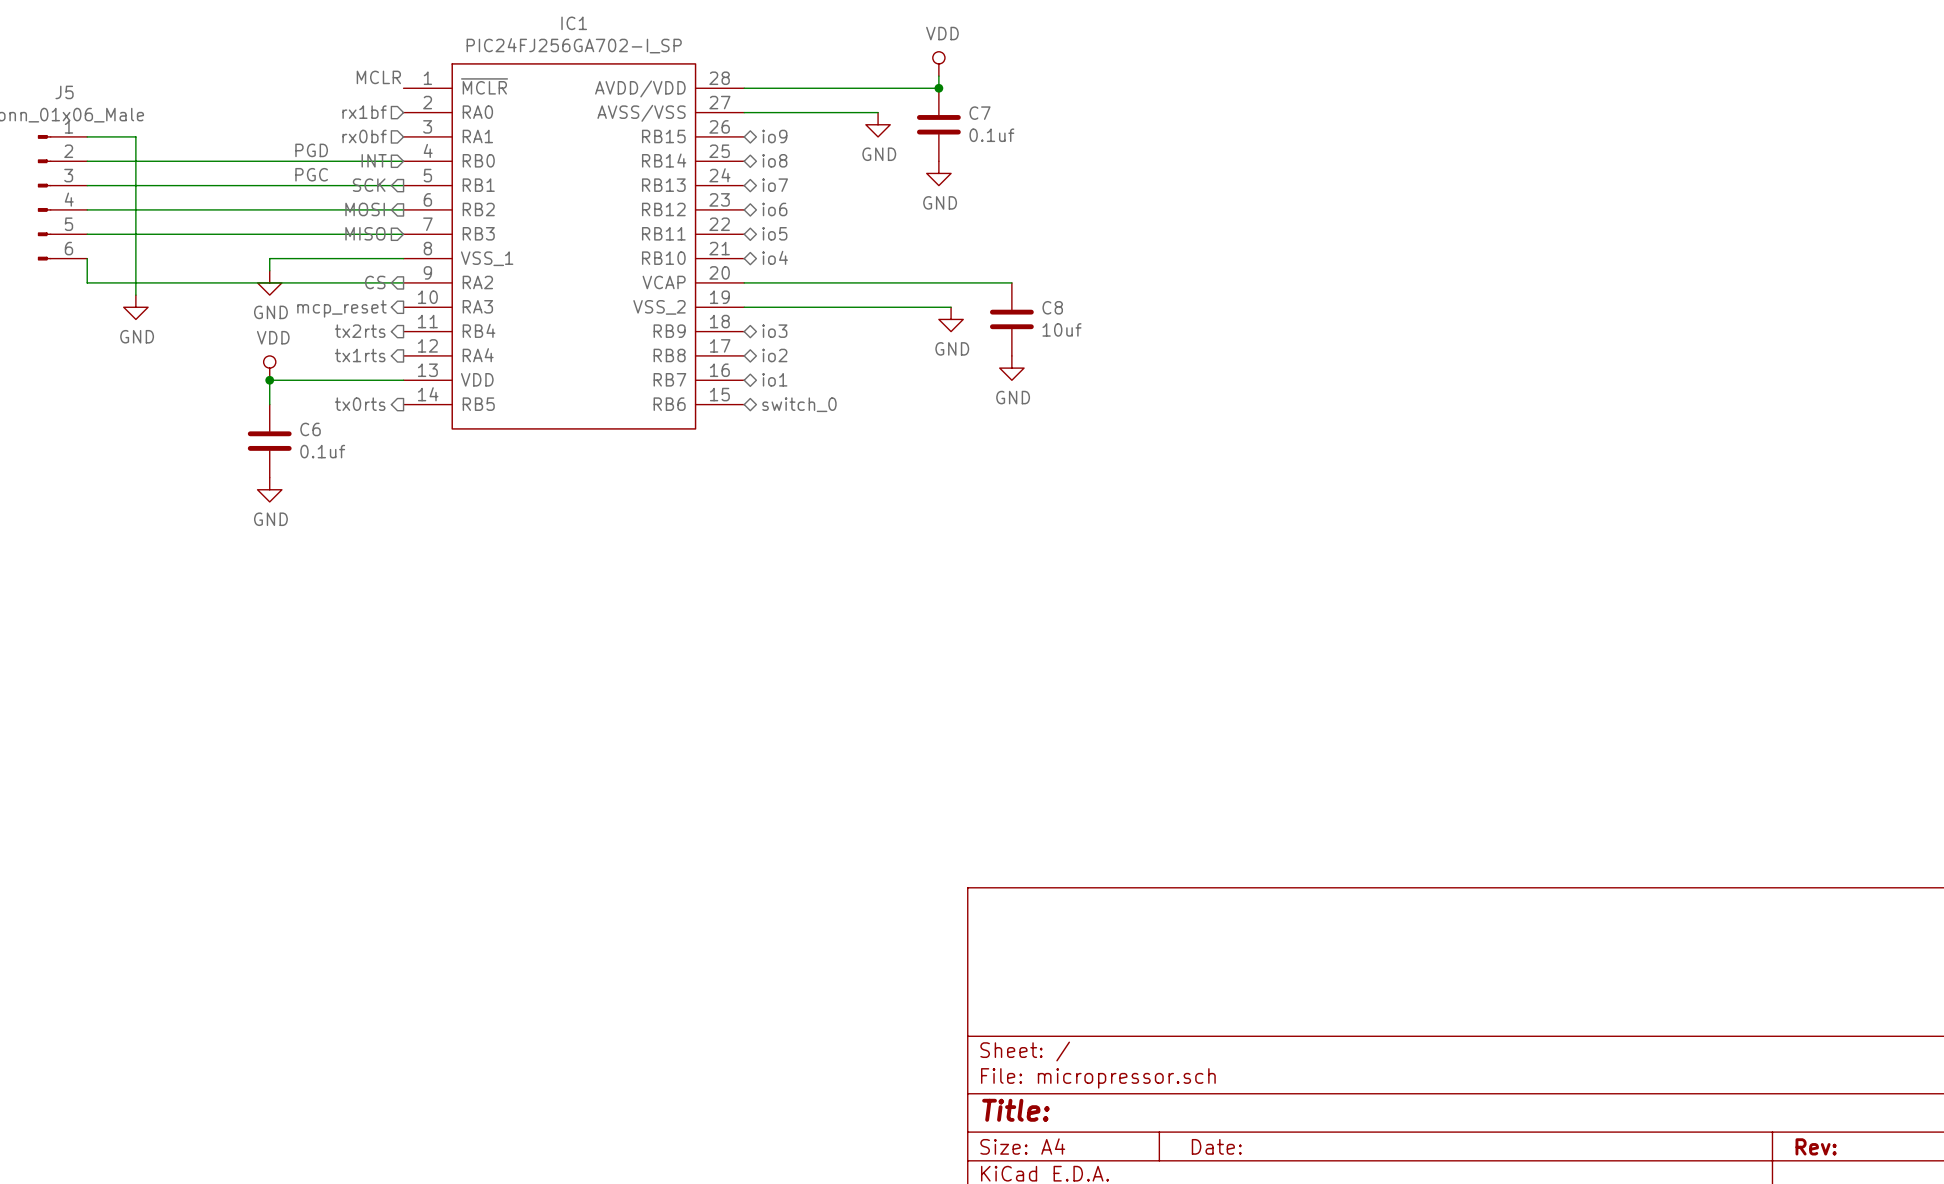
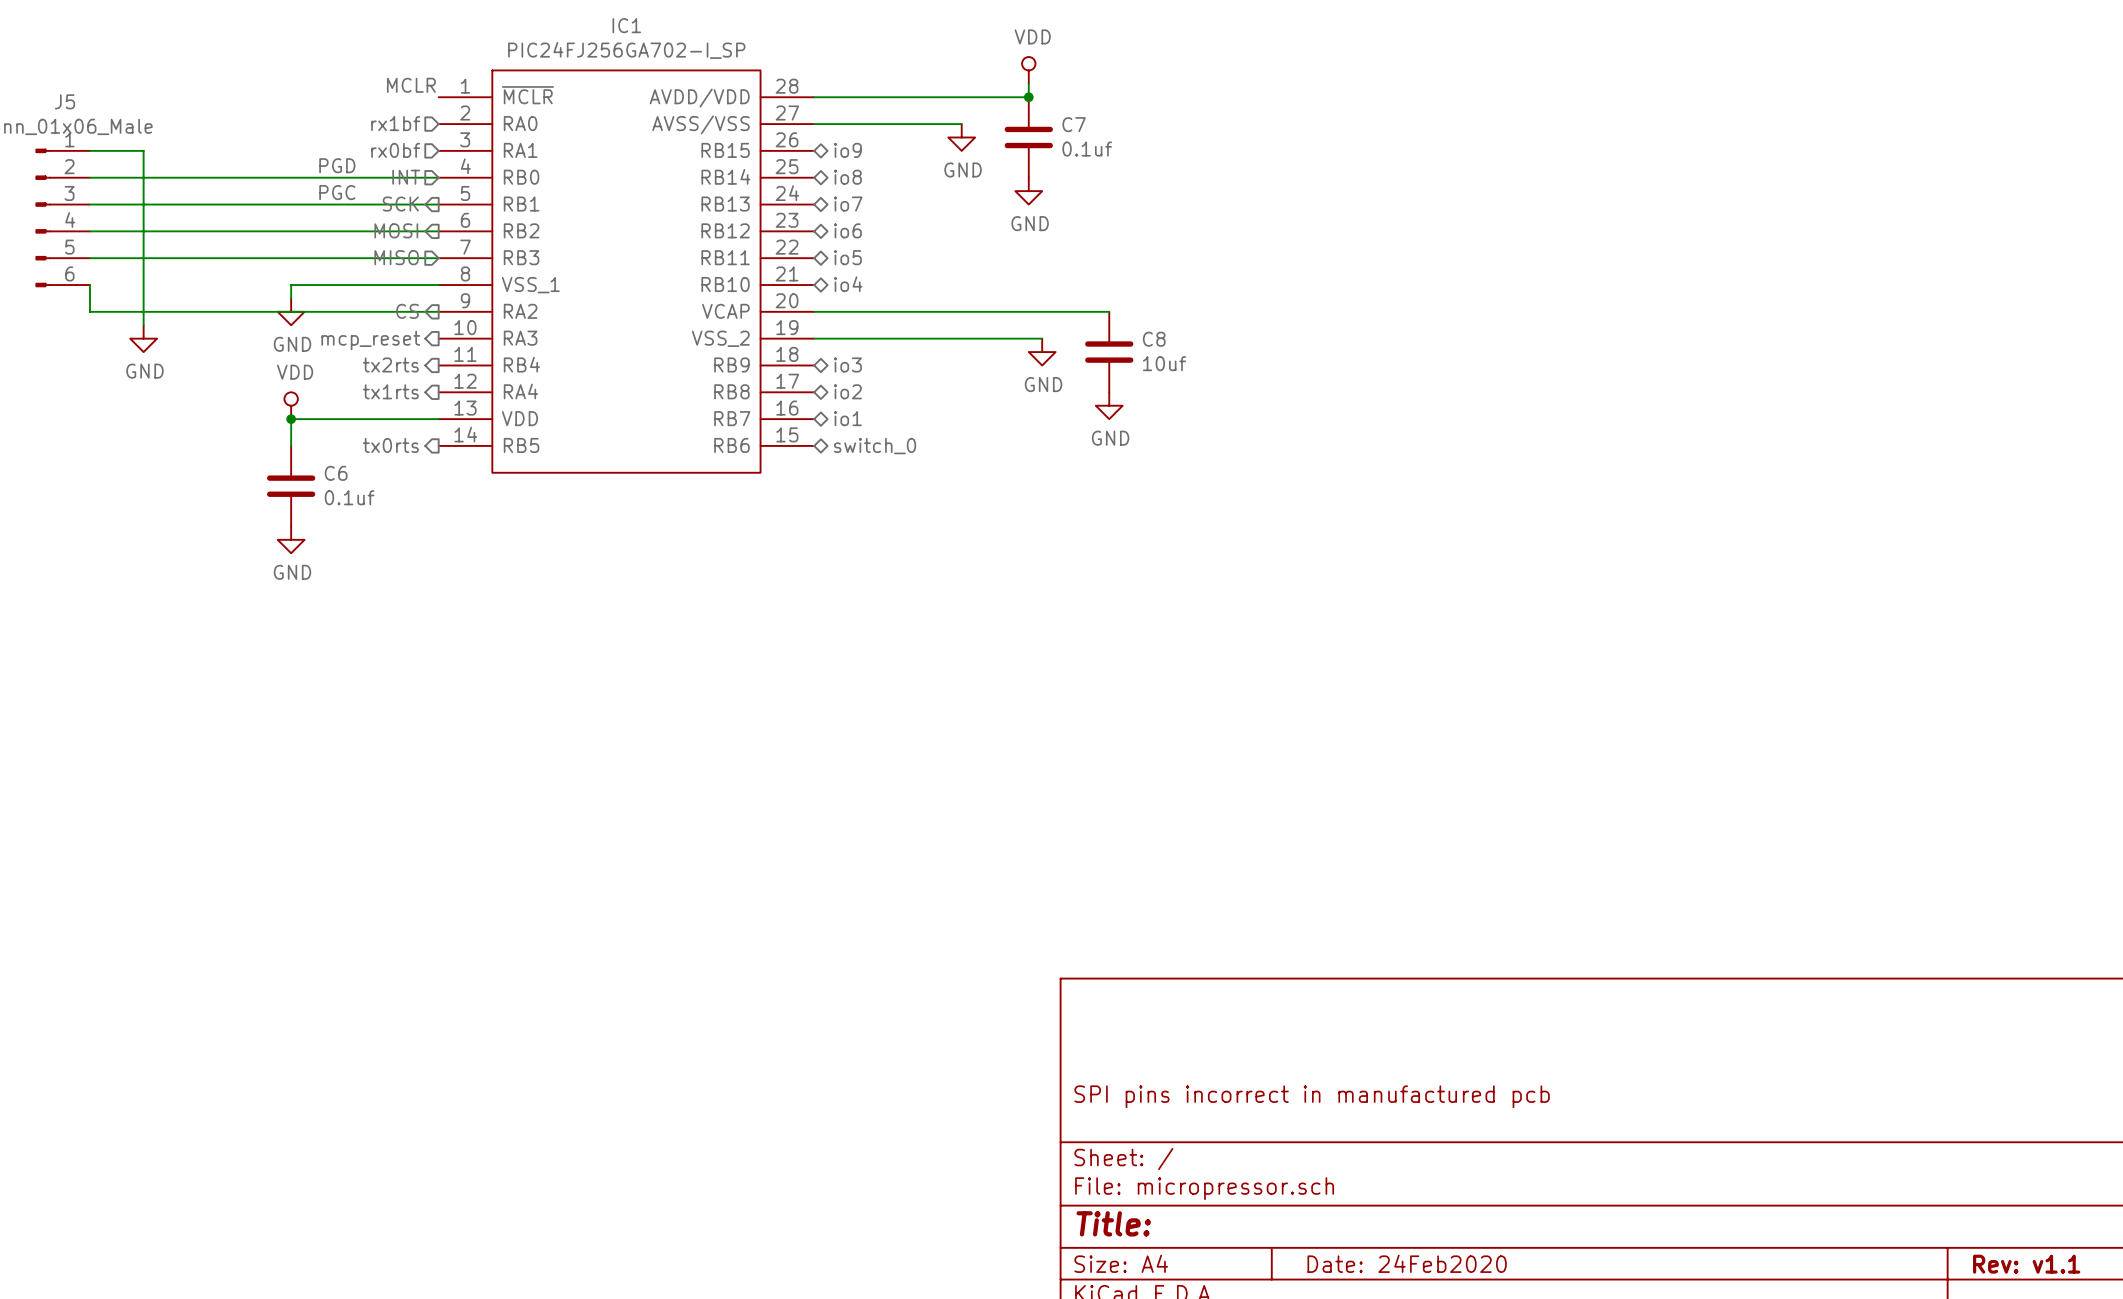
title block: none -> SPI pins incorrect in manufactured pcb (1312, 1096)
title block: Date: (1216, 1146) -> Date: 24Feb2020 (1407, 1263)
title block: Rev: (1816, 1146) -> Rev: v1.1 (2026, 1264)

